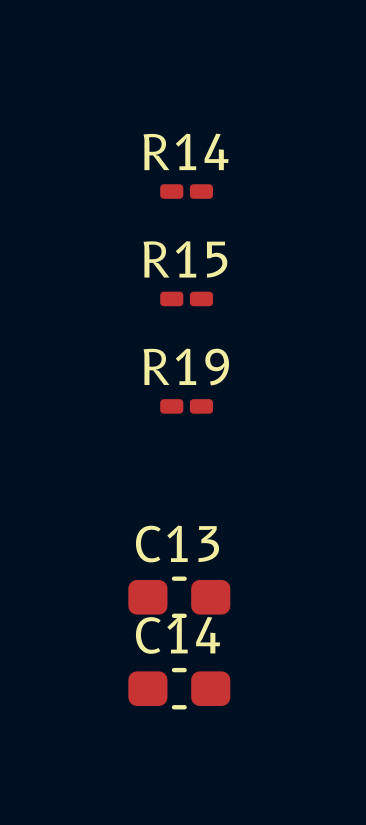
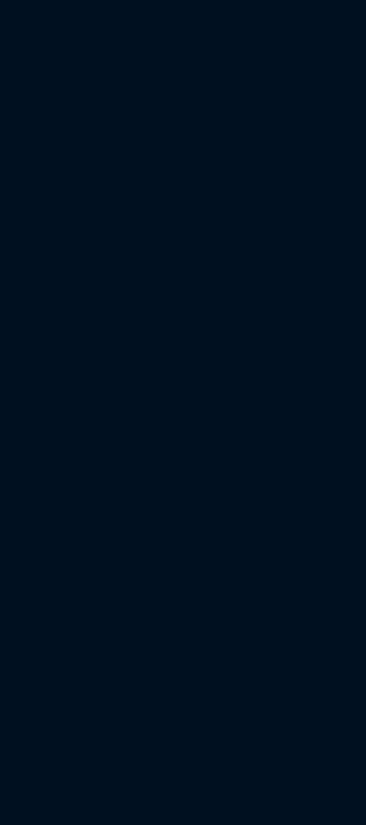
R14: (186, 191) -> none
R15: (186, 298) -> none
R19: (186, 406) -> none
C13: (179, 597) -> none
C14: (179, 688) -> none

